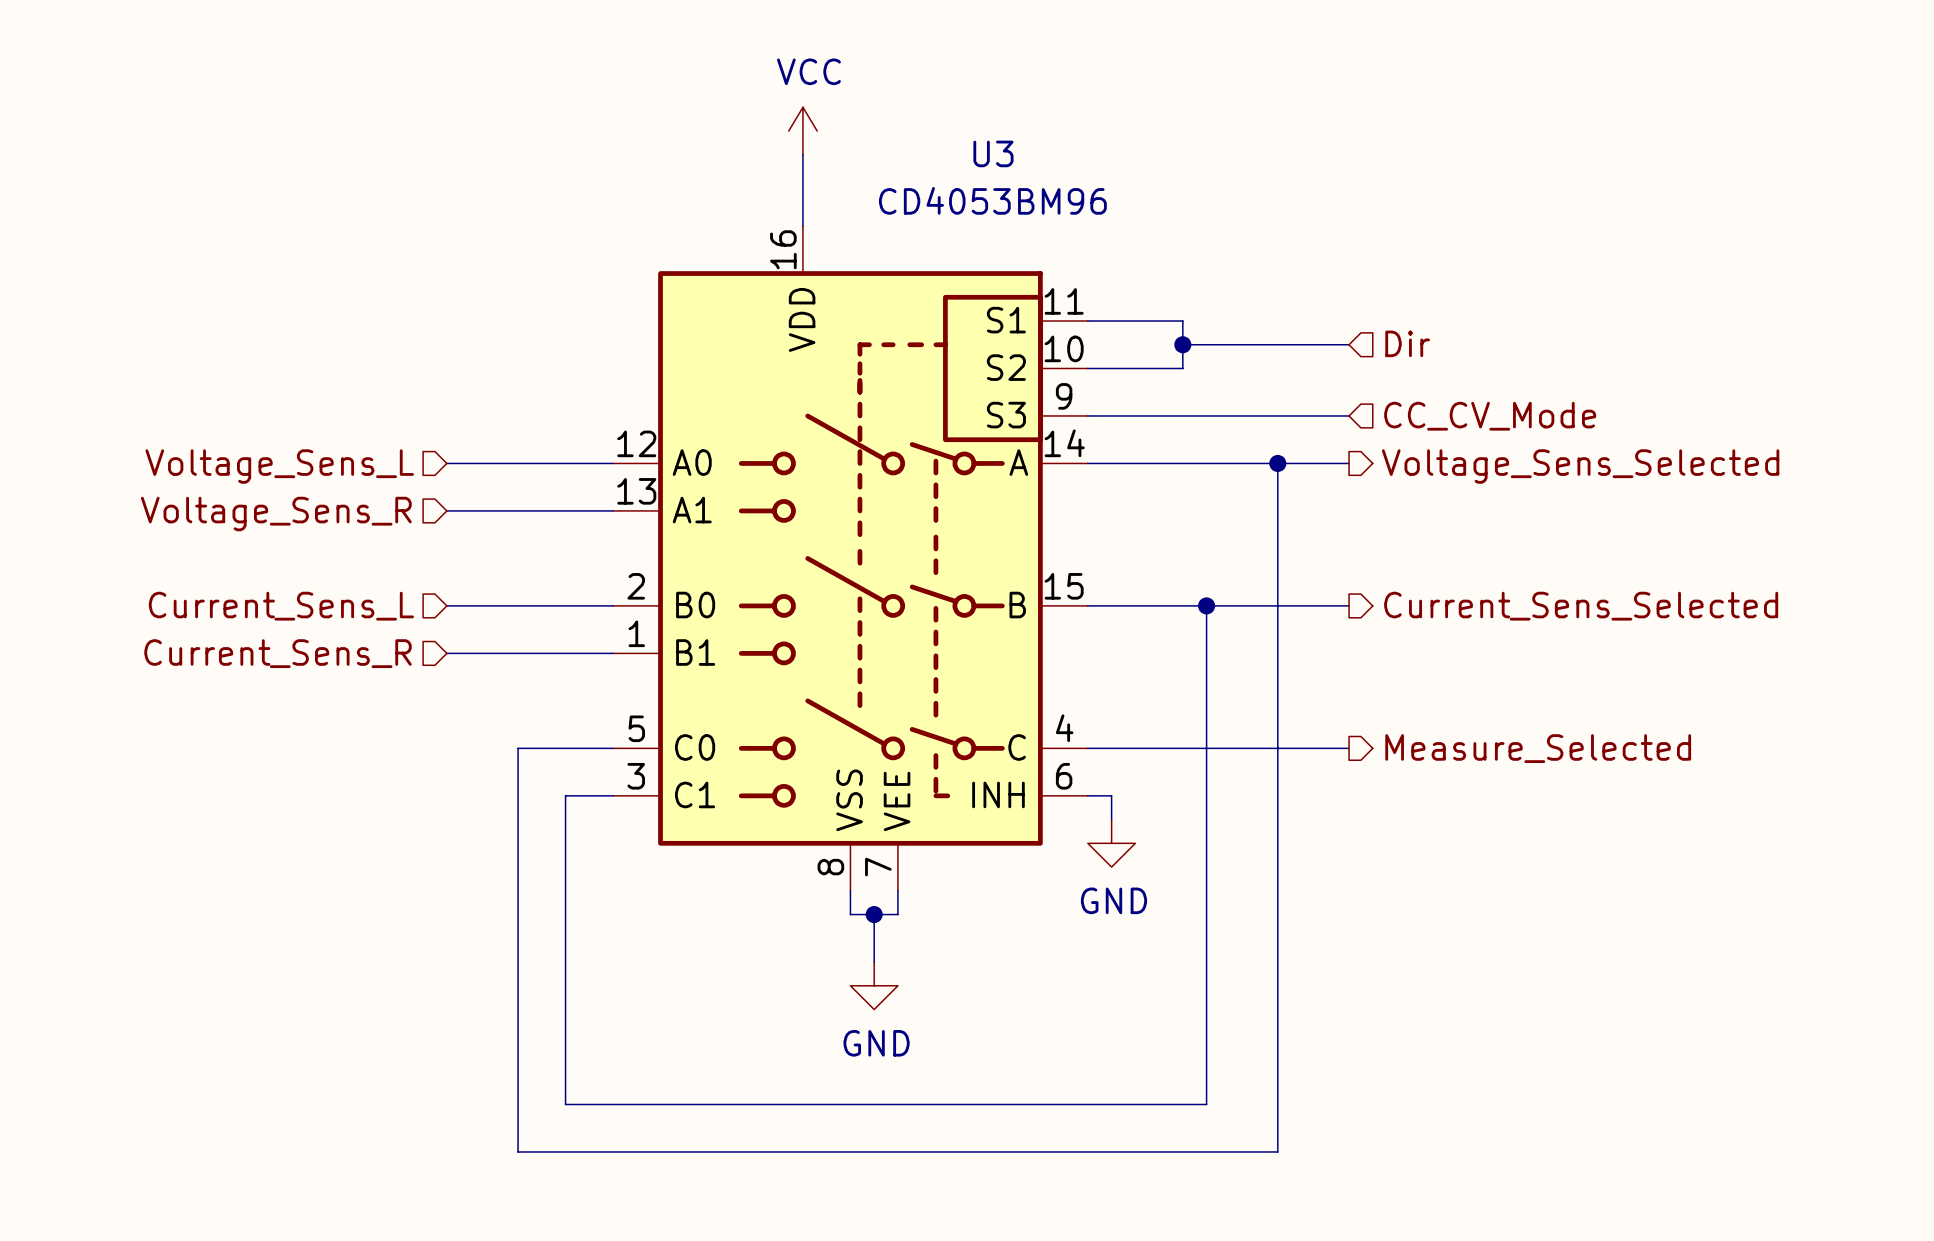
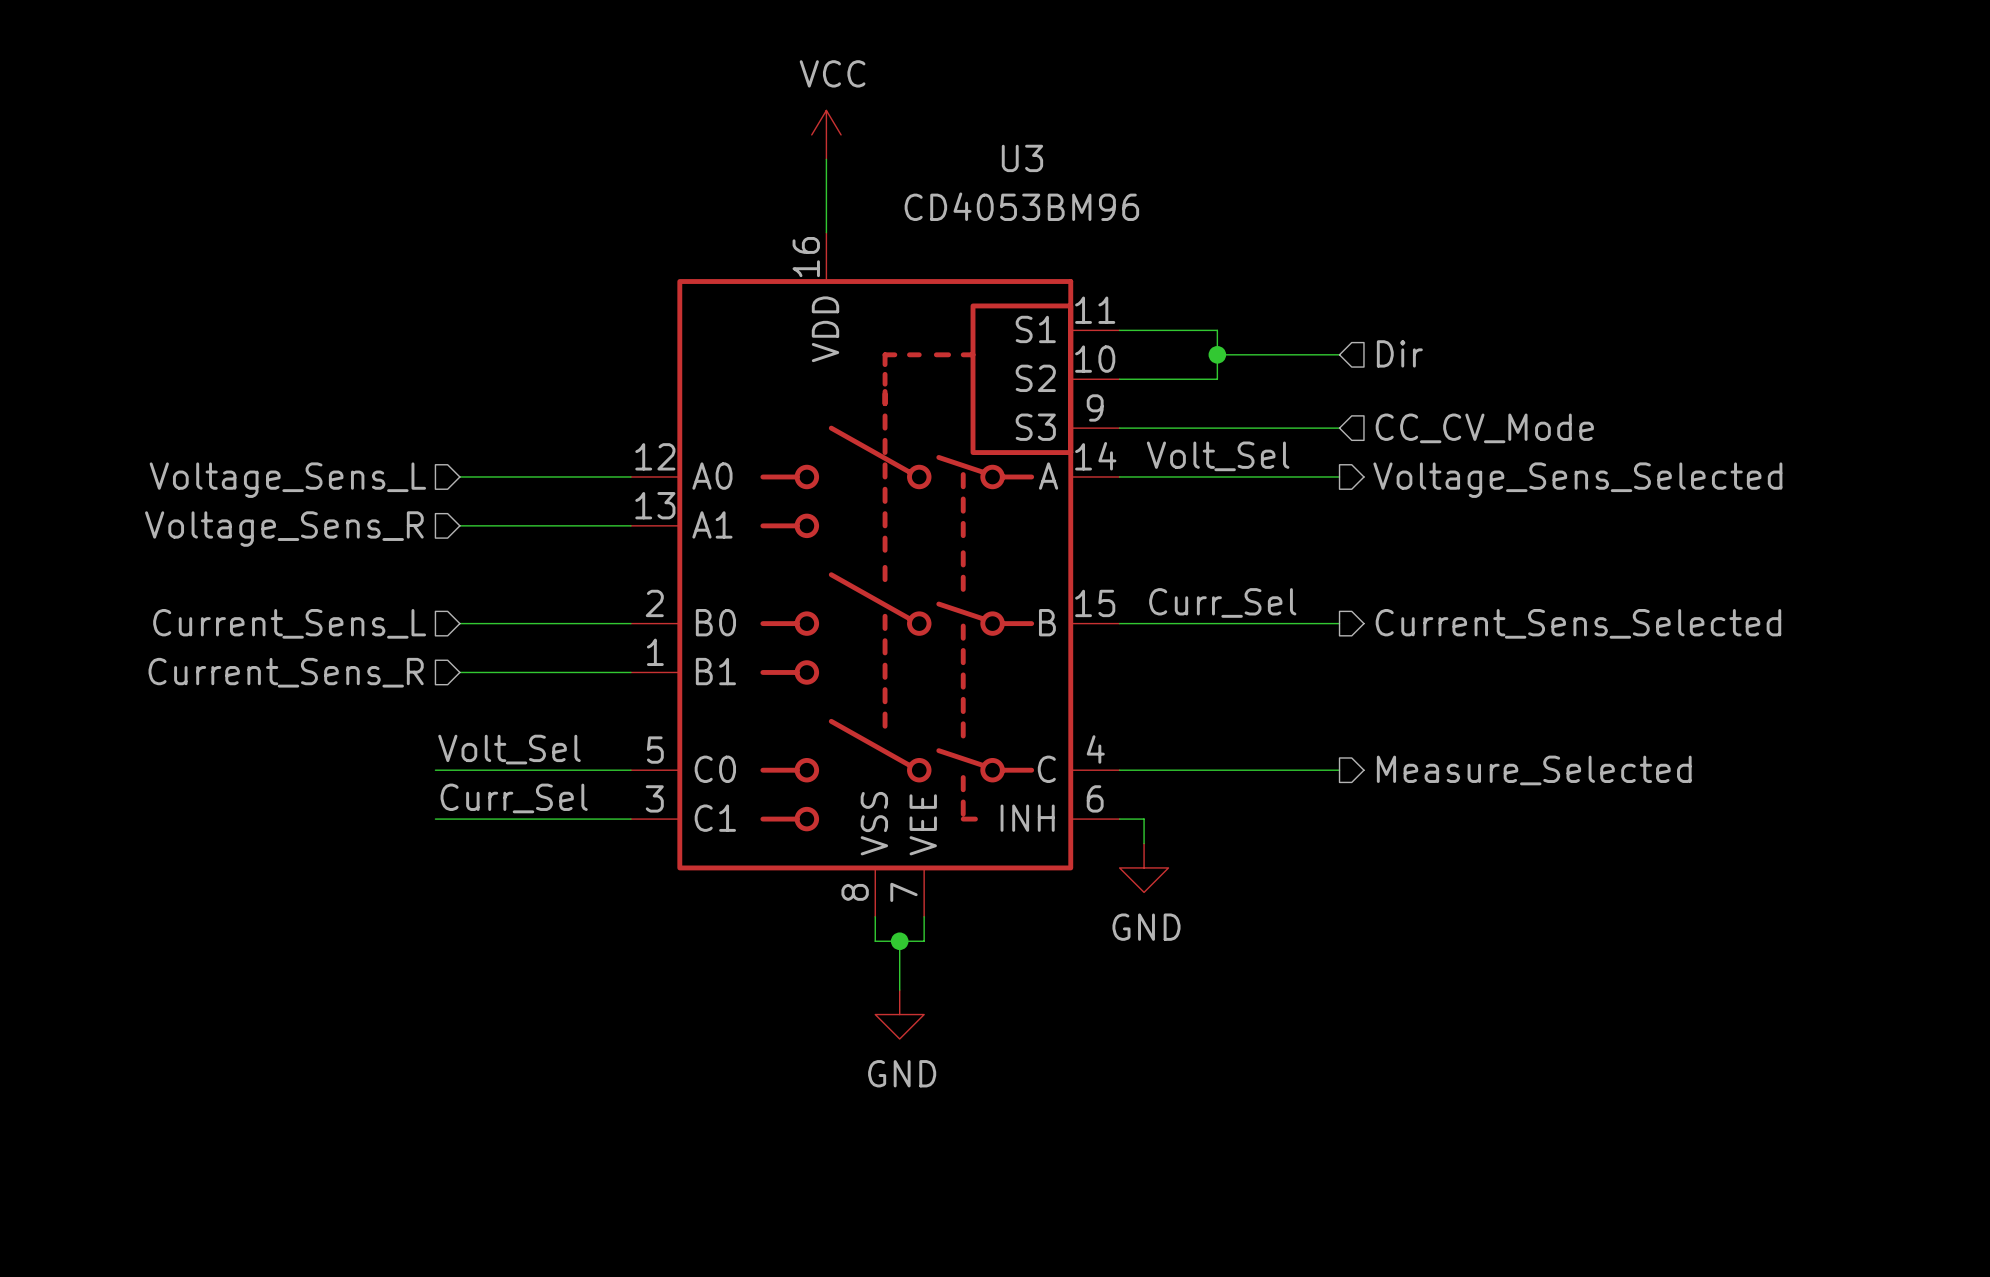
hierarchical label position: Dir (1407, 343) -> Dir (1399, 353)
wire: (1301, 344) (1349, 344) -> none
wire: (1301, 415) (1349, 415) -> none
hierarchical label position: CC_CV_Mode (1490, 416) -> CC_CV_Mode (1484, 428)
label: none -> Volt_Sel (1218, 456)
wire: (1277, 463) (1277, 1151) (518, 1151) (518, 748) -> (435, 770) (533, 770)
junction: (1277, 463) -> none
wire: (1301, 463) (1349, 463) -> none
hierarchical label position: Voltage_Sens_Selected (1580, 466) -> Voltage_Sens_Selected (1577, 480)
label: none -> Curr_Sel (1222, 602)
wire: (1206, 605) (1206, 1104) (565, 1104) (565, 795) -> (435, 819) (582, 819)
junction: (1206, 605) -> none
wire: (1301, 605) (1349, 605) -> none
hierarchical label position: Current_Sens_Selected (1581, 606) -> Current_Sens_Selected (1578, 623)
label: none -> Volt_Sel (509, 749)
wire: (1301, 748) (1349, 748) -> none
hierarchical label position: Measure_Selected (1538, 748) -> Measure_Selected (1534, 770)
label: none -> Curr_Sel (514, 798)

